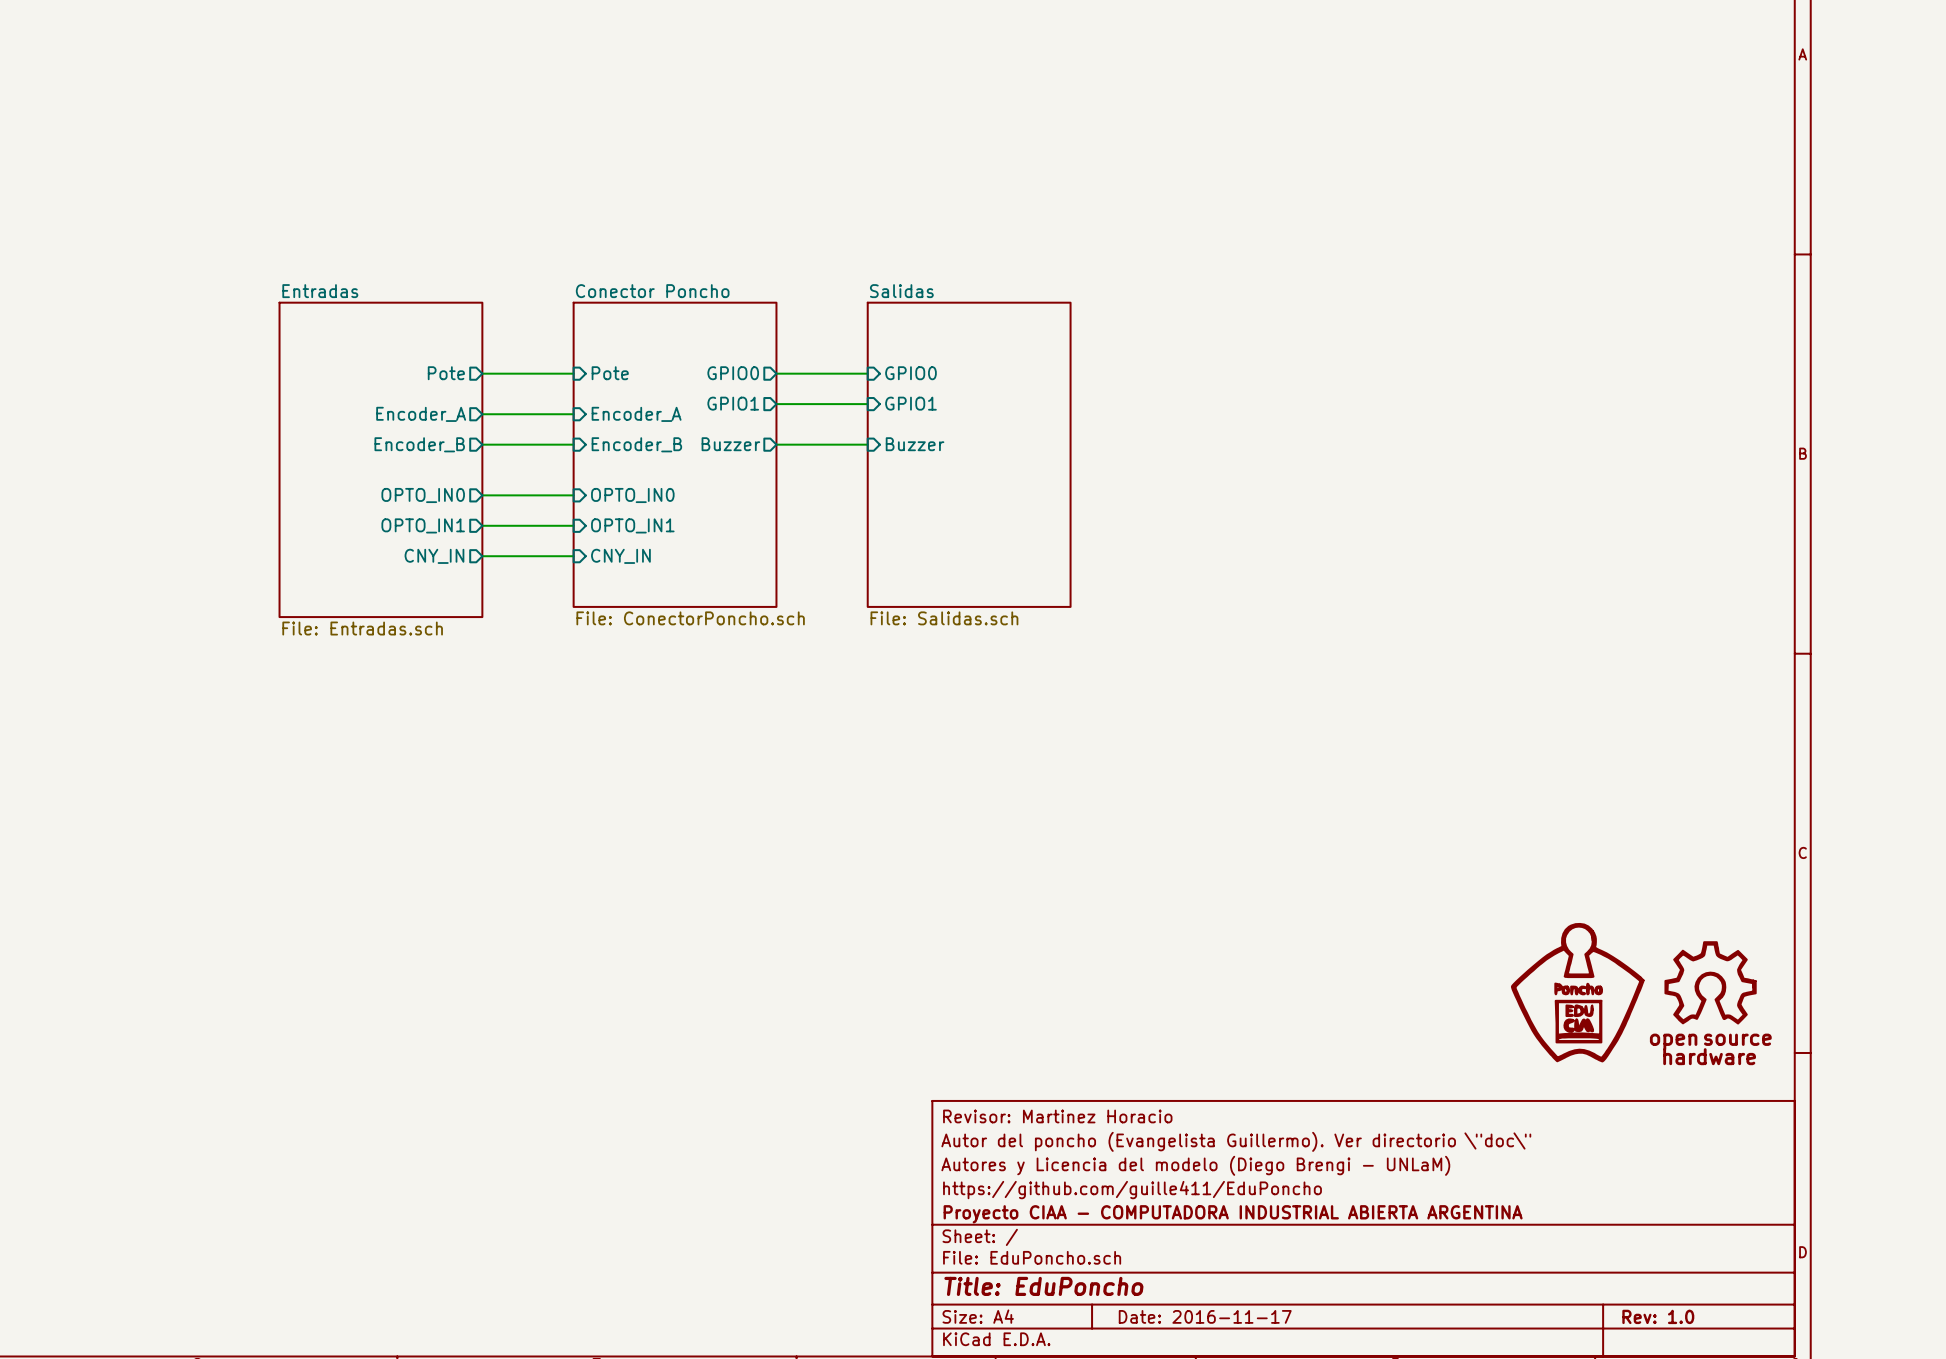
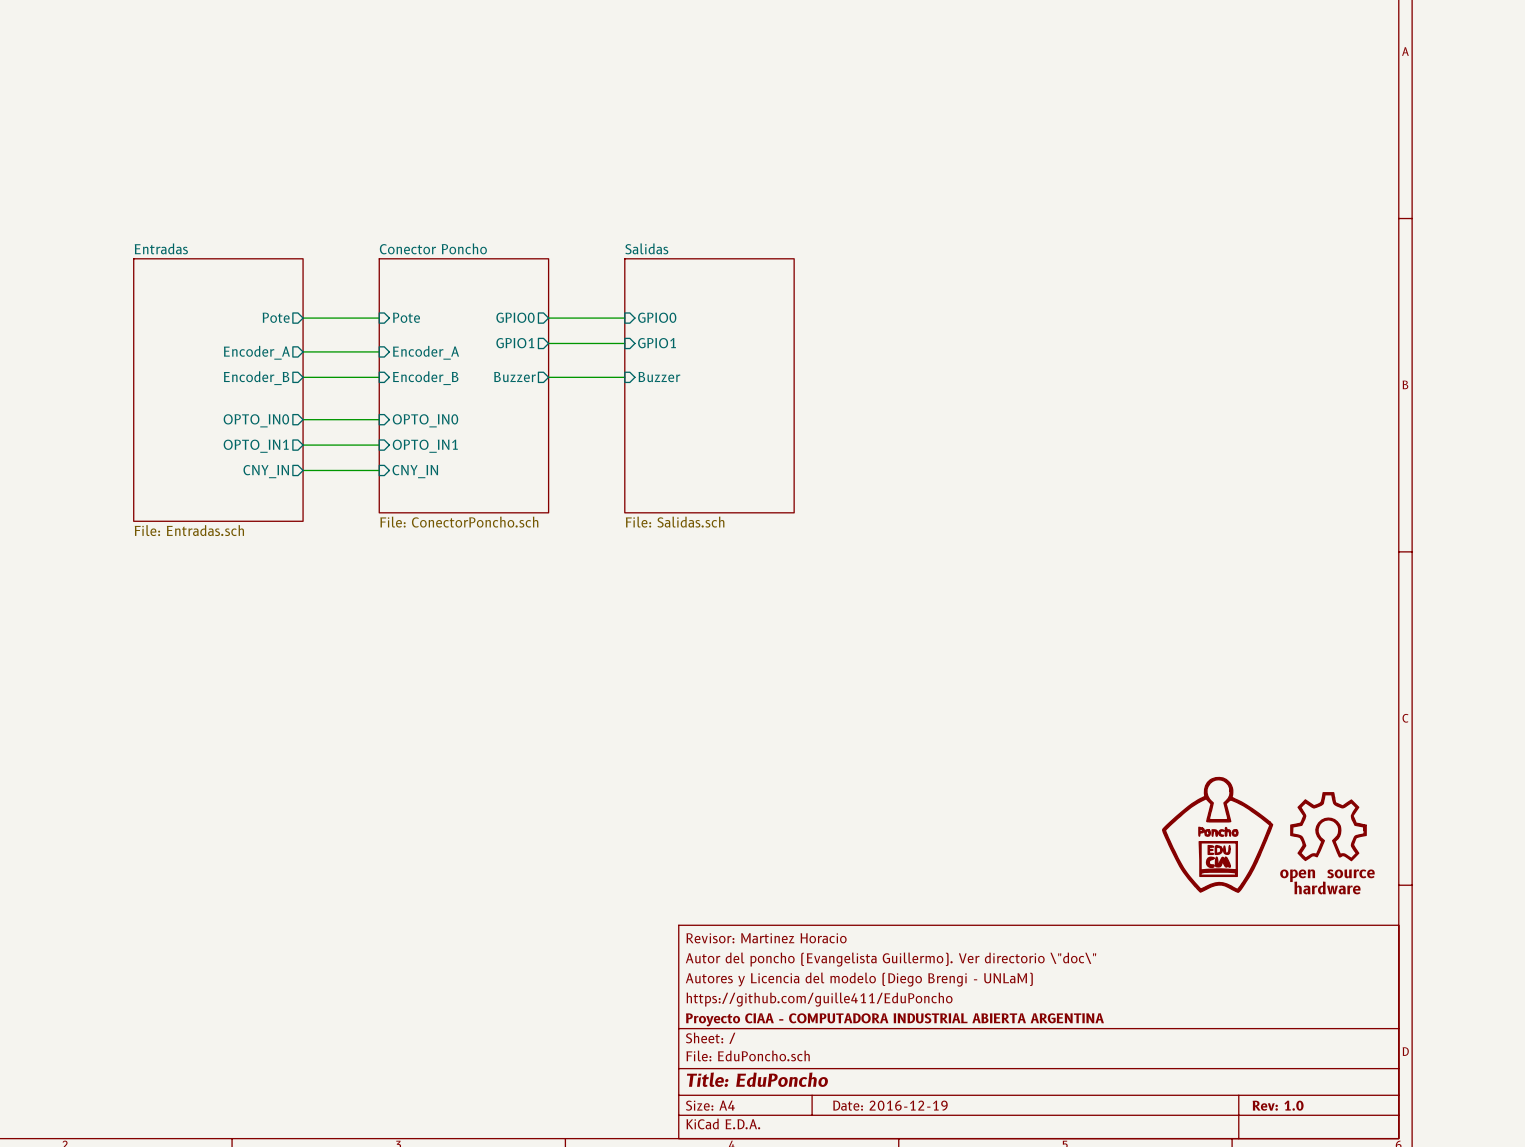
title block: Date: 2016-11-17 (1205, 1316) -> Date: 2016-12-19 (890, 1105)

